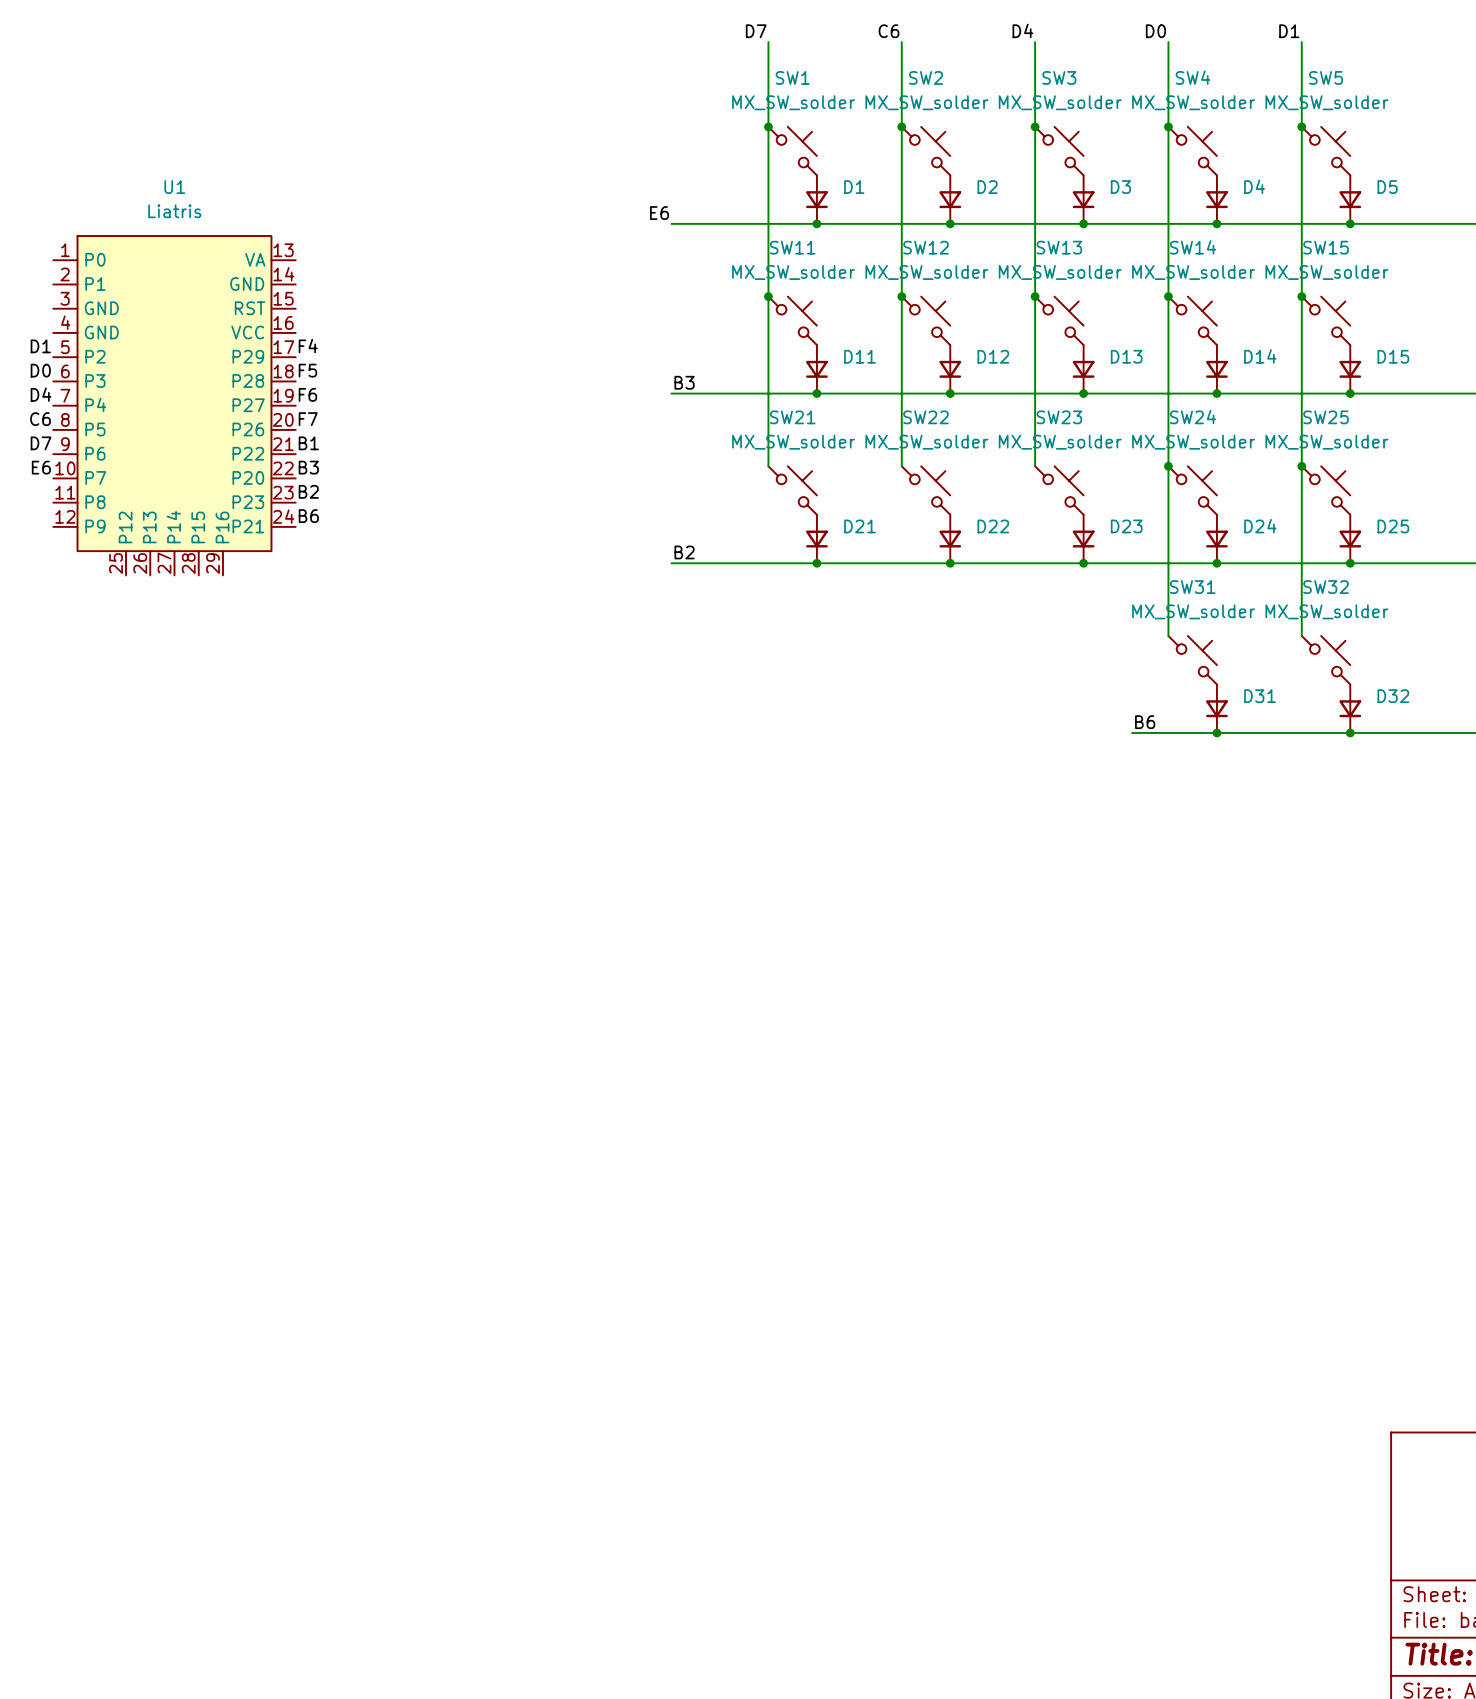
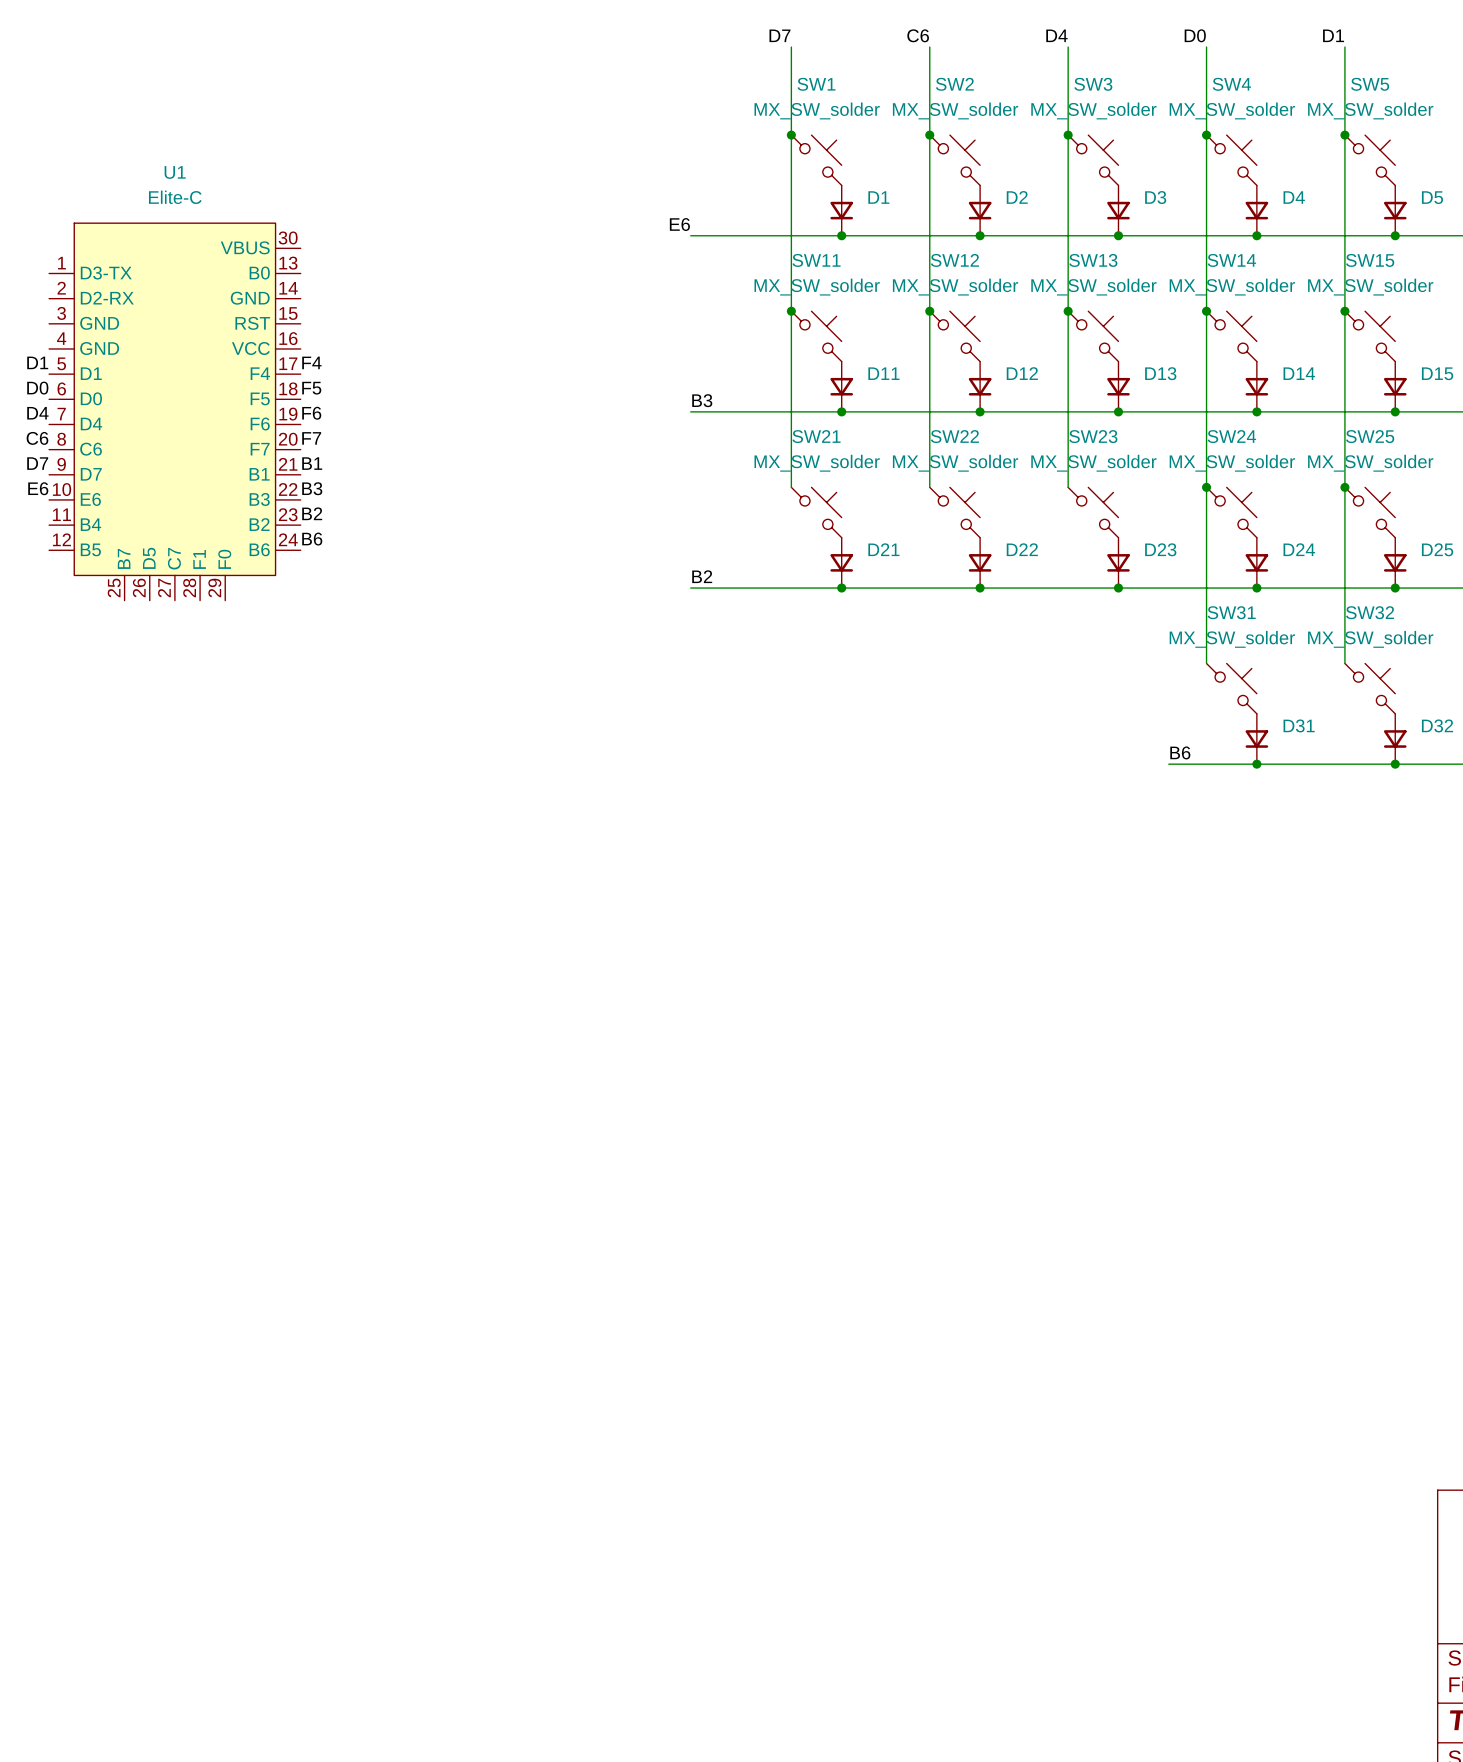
U1 value: Liatris (174, 211) -> Elite-C (175, 197)
U1 symbol: [53, 235, 296, 576] -> [49, 223, 301, 601]

